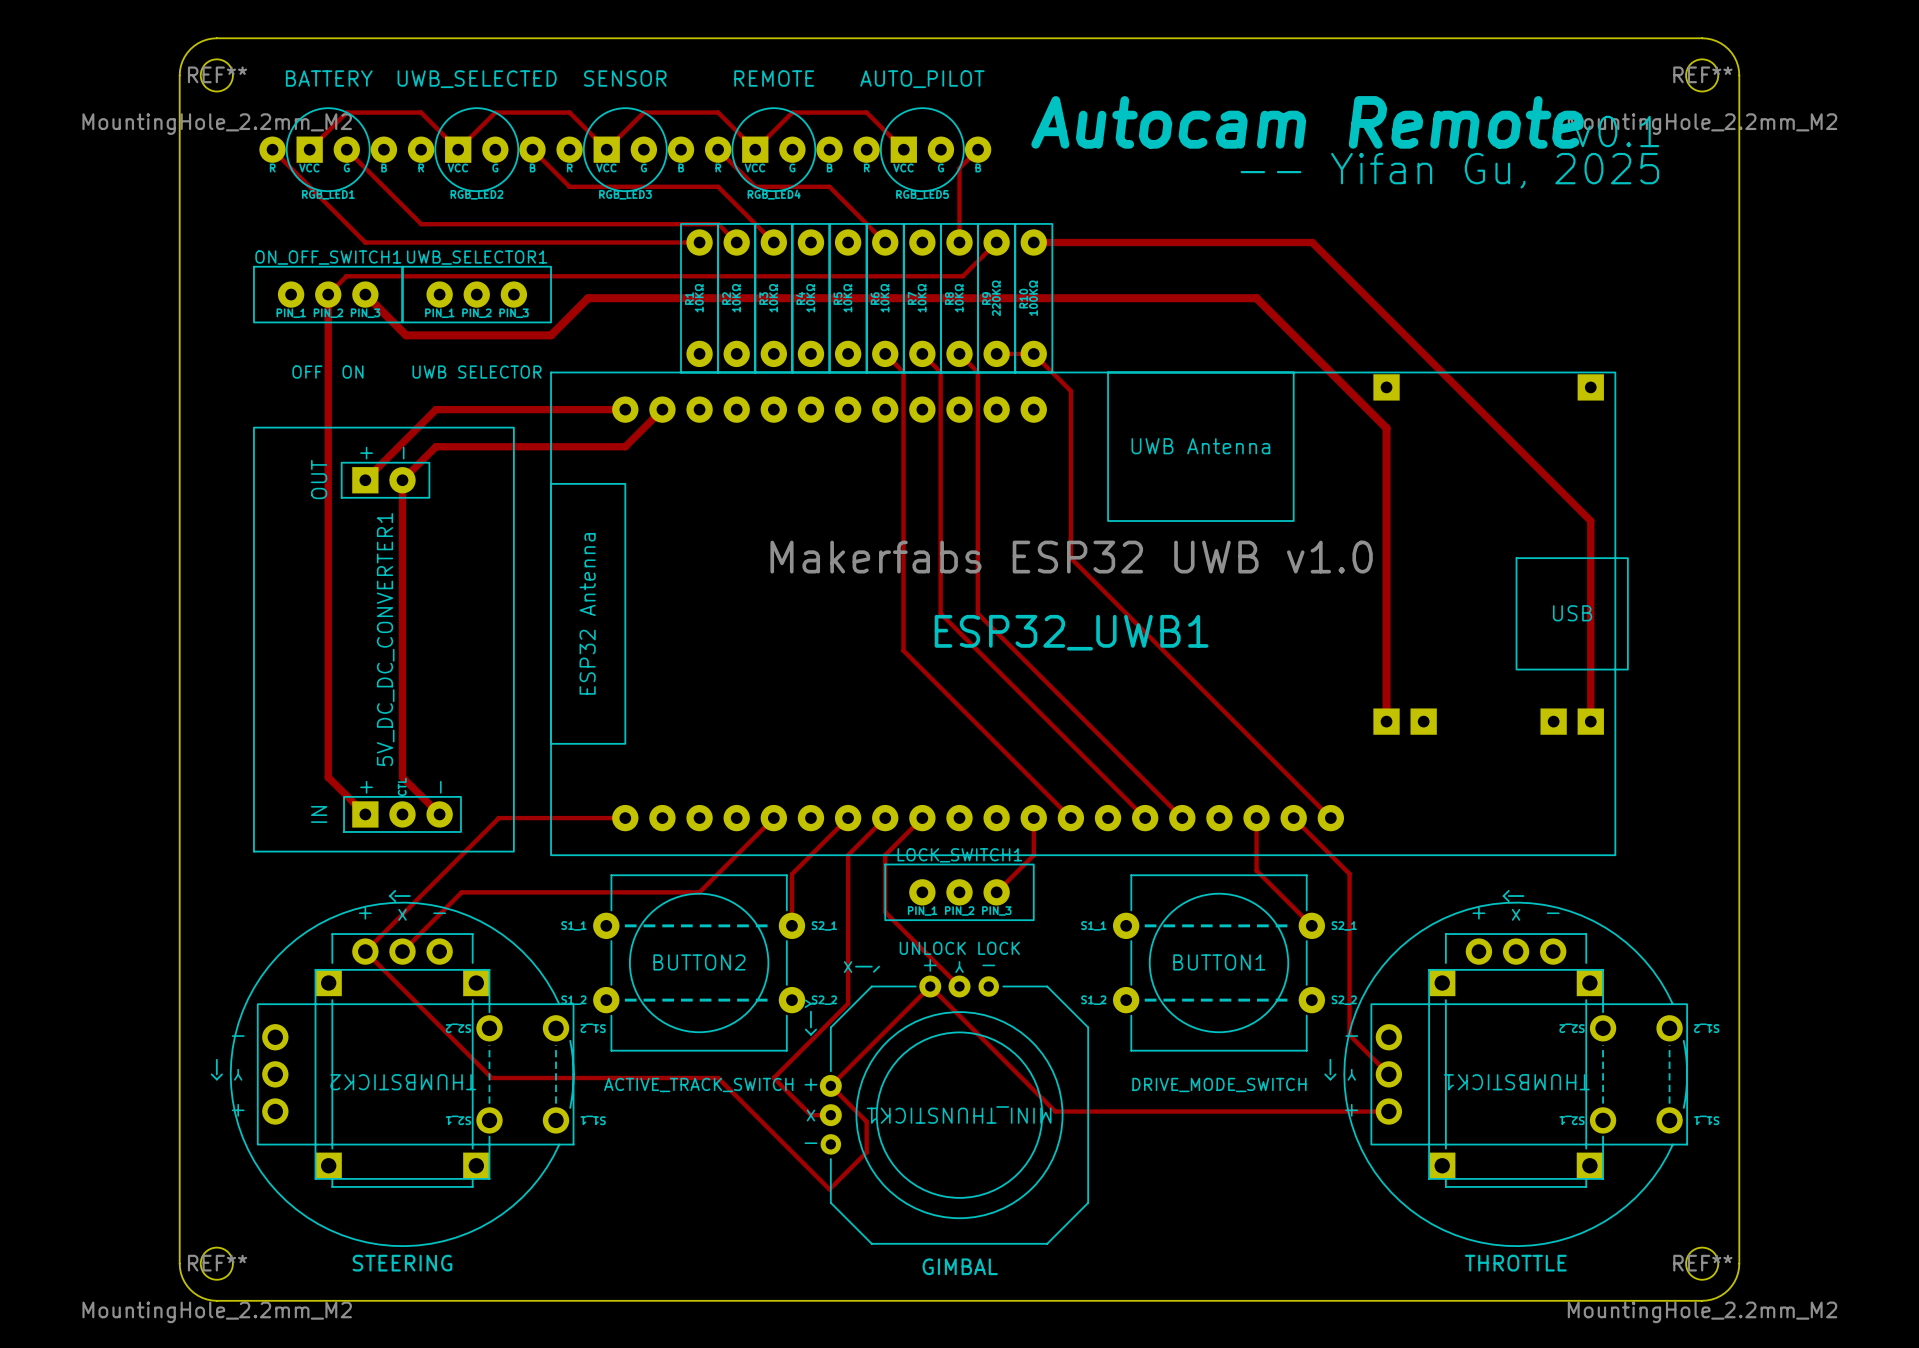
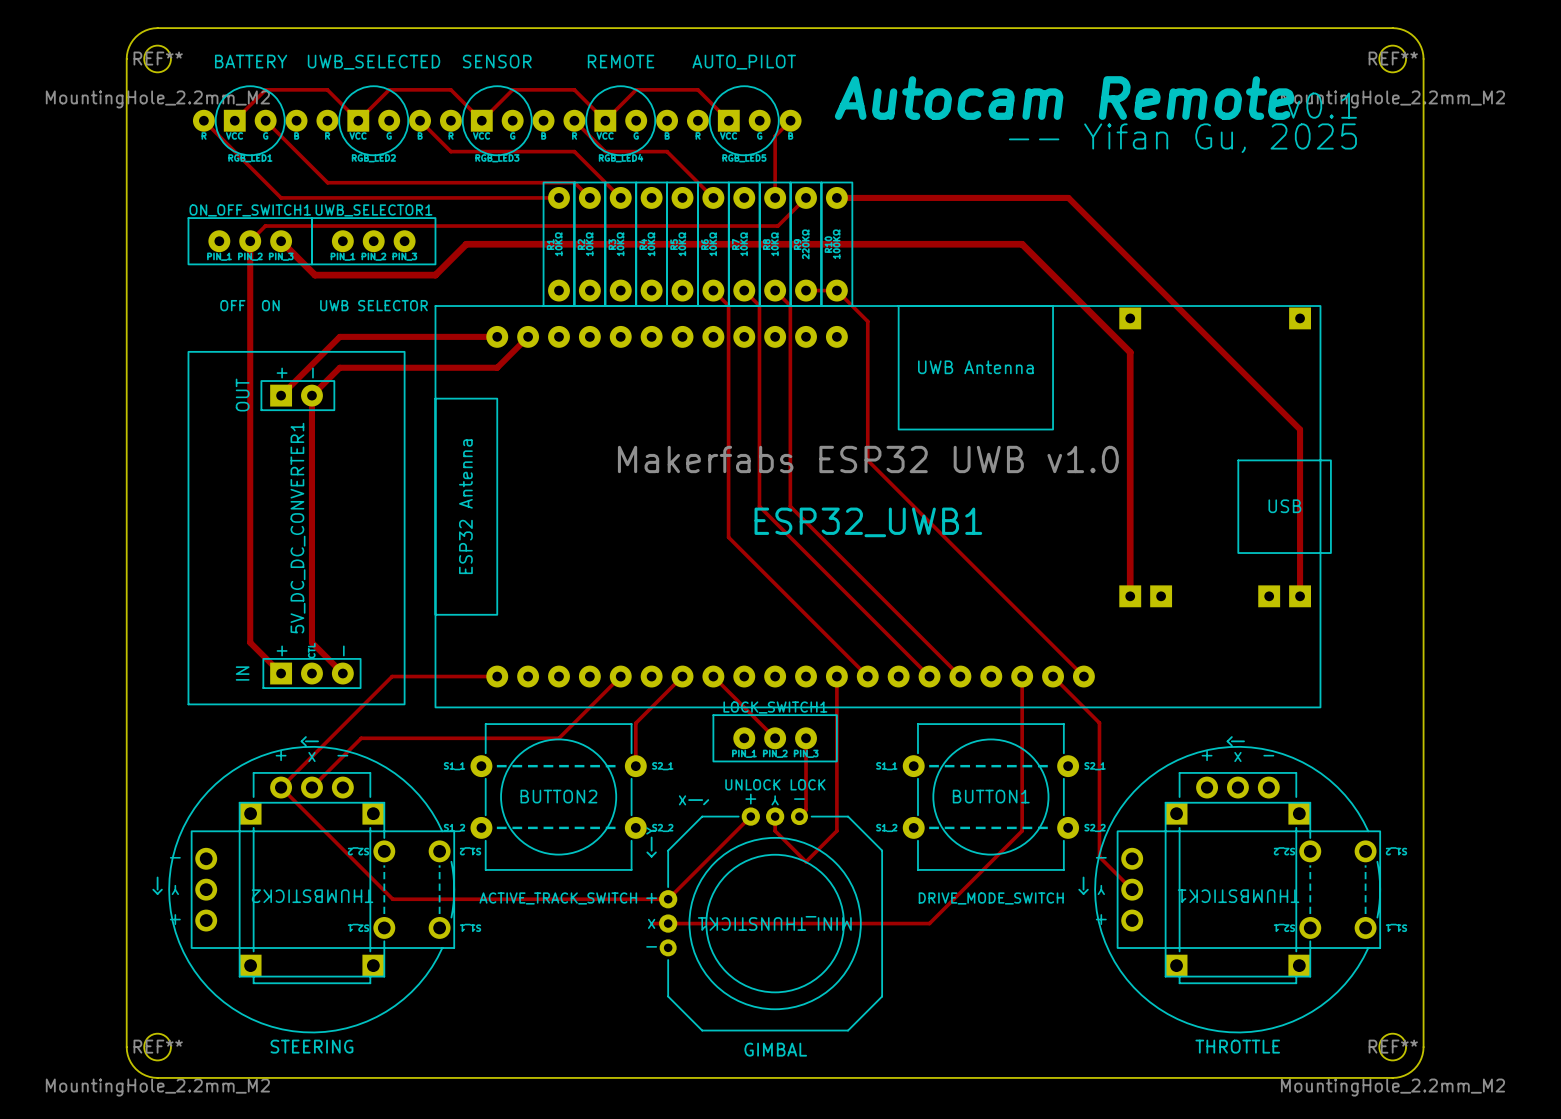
track: (885, 818) (848, 855) (848, 1003) (773, 1078) (810, 1115) -> (713, 676) (775, 738)
track: (922, 818) (885, 855) (885, 912) (959, 986) -> none
track: (1033, 855) (996, 892) -> (836, 707) (836, 830) (806, 861) (775, 830) (775, 816)
track: (1256, 870) (1311, 925) -> (1022, 720) (1022, 830) (929, 923) (668, 923)
track: none -> (806, 738) (806, 810) (799, 816)
track: (930, 986) (1055, 1111) (1388, 1111) -> none
track: (491, 1078) (718, 1078) (829, 1189) (866, 1152) (866, 1121) (830, 1085) -> (386, 892) (392, 899) (668, 899)

